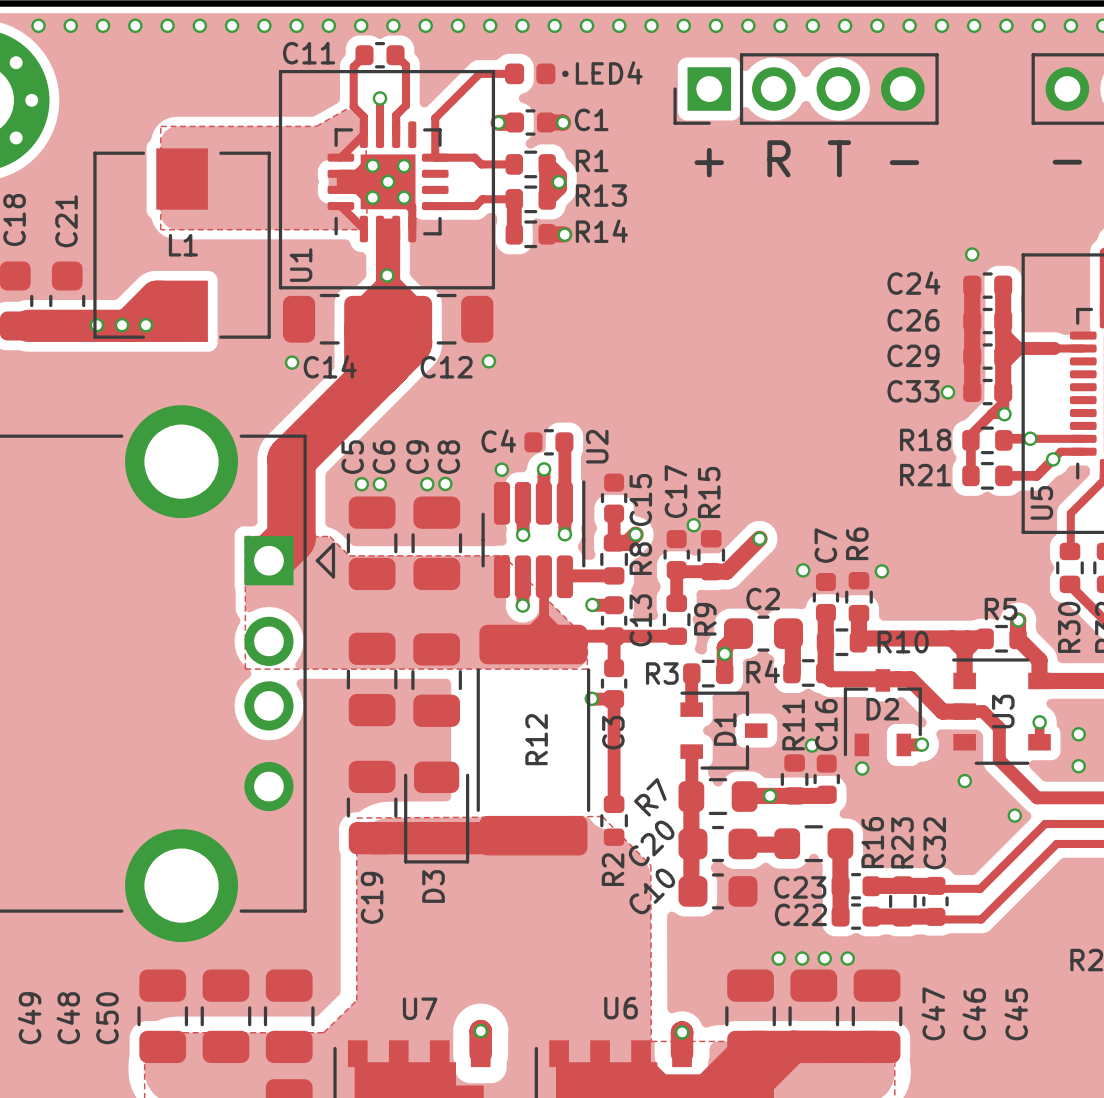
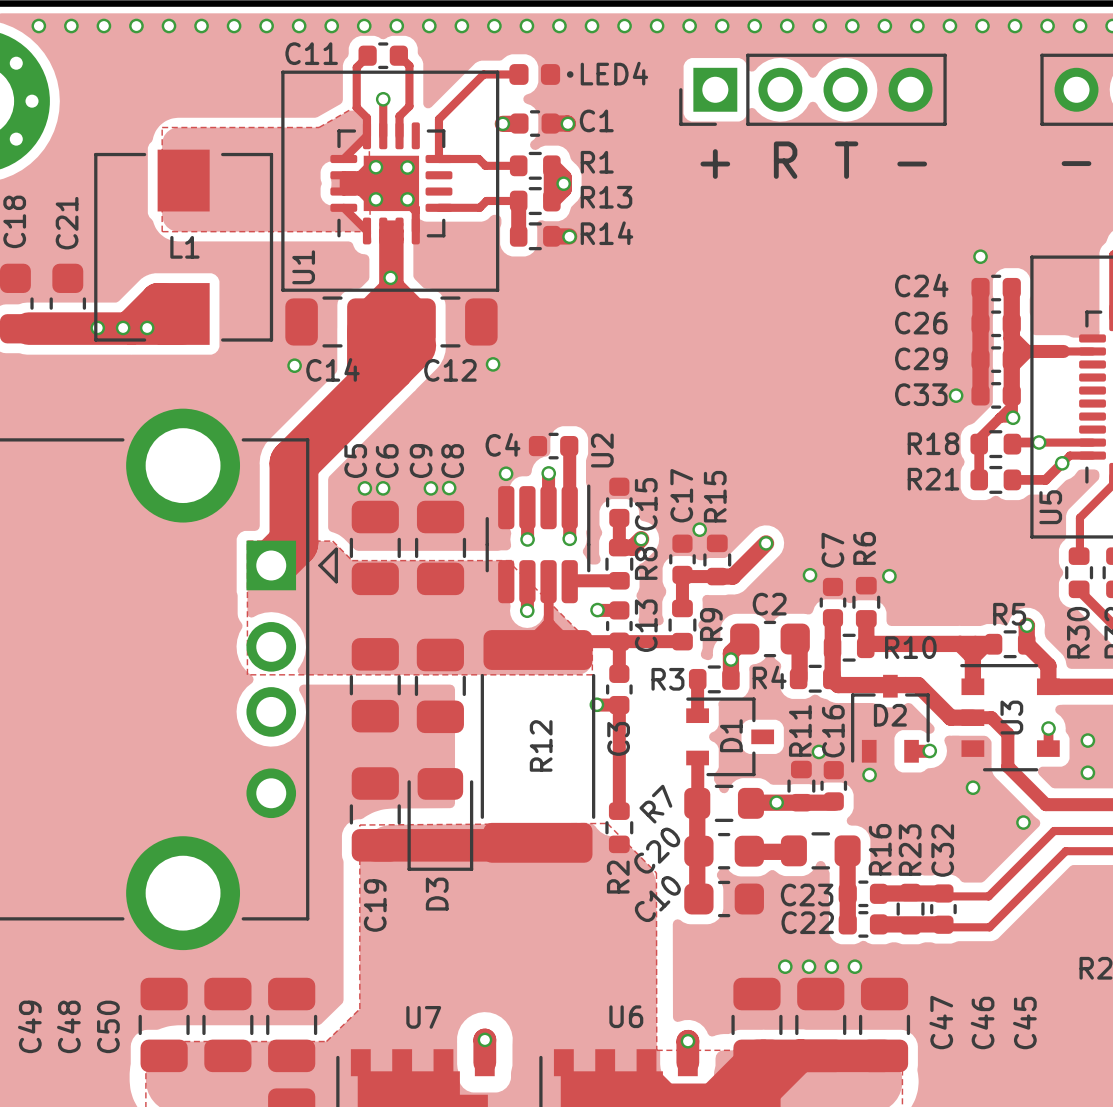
via: (388, 181) -> none

